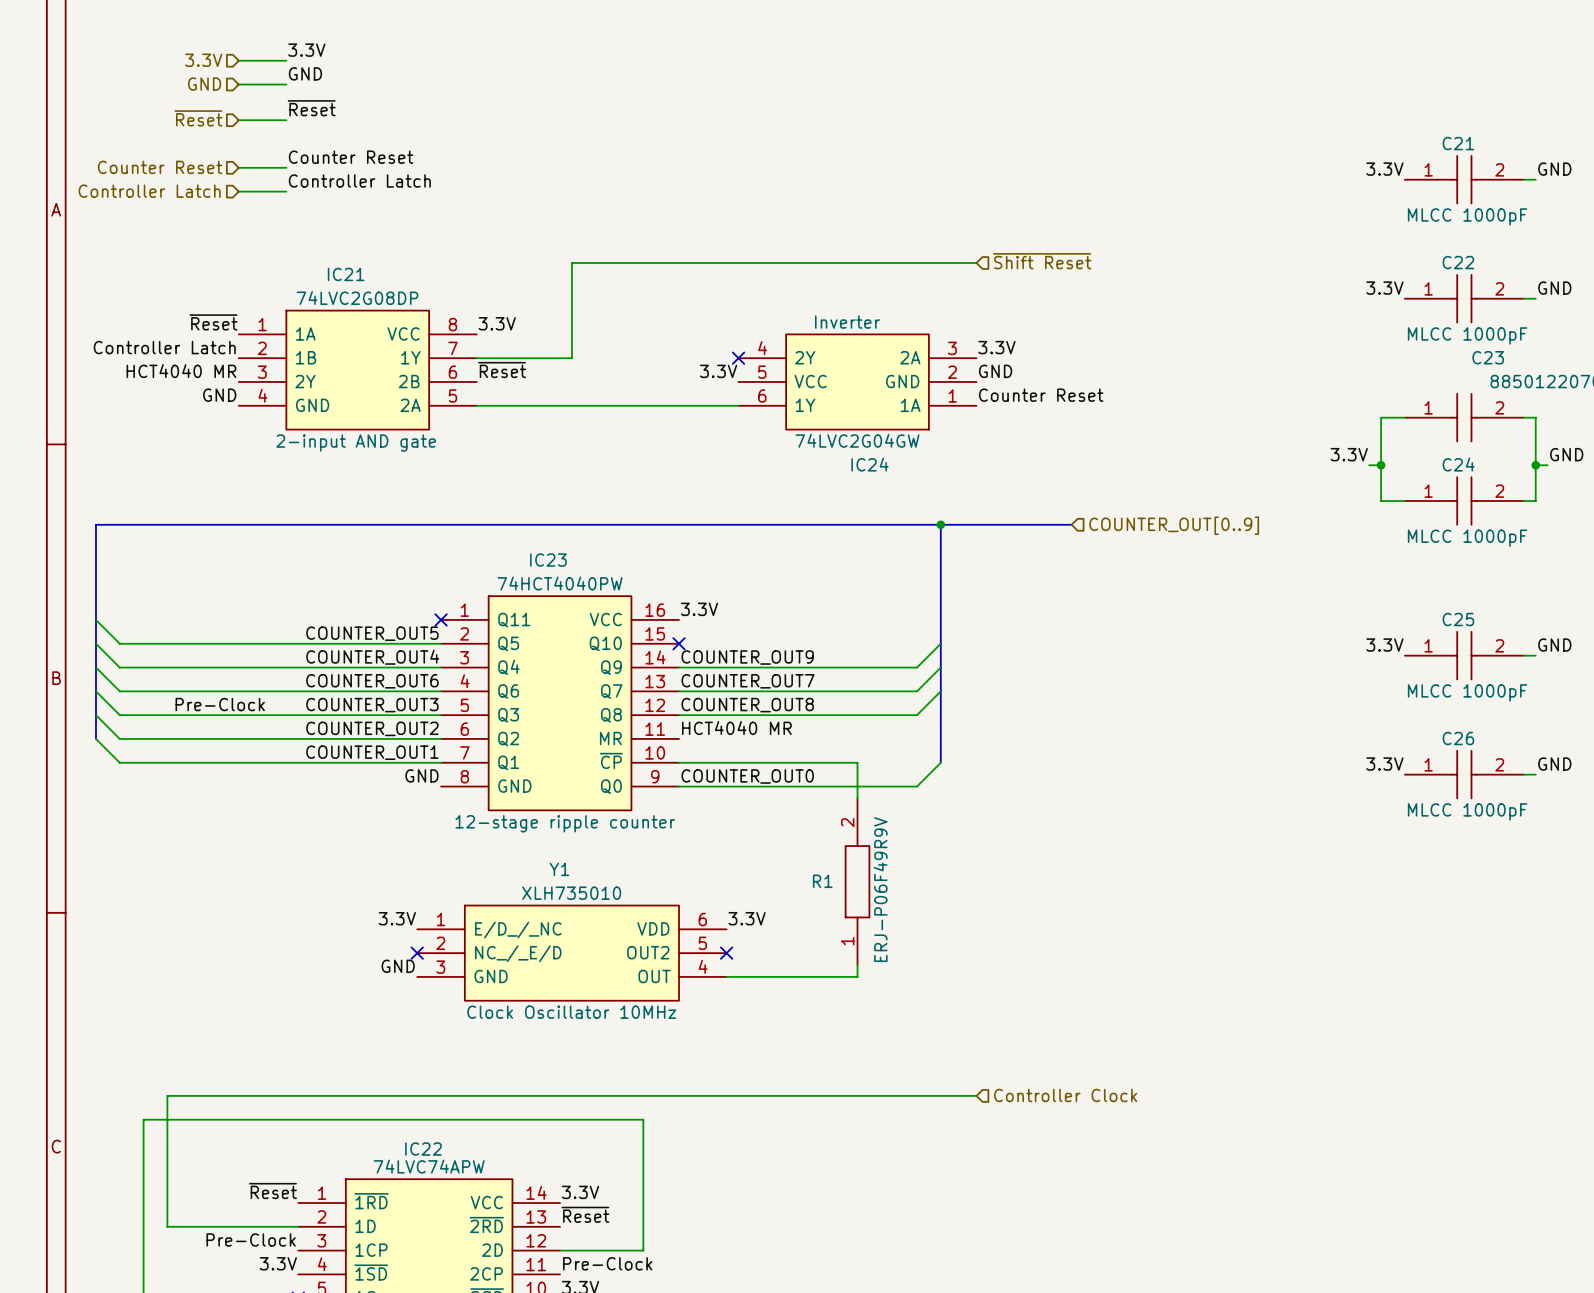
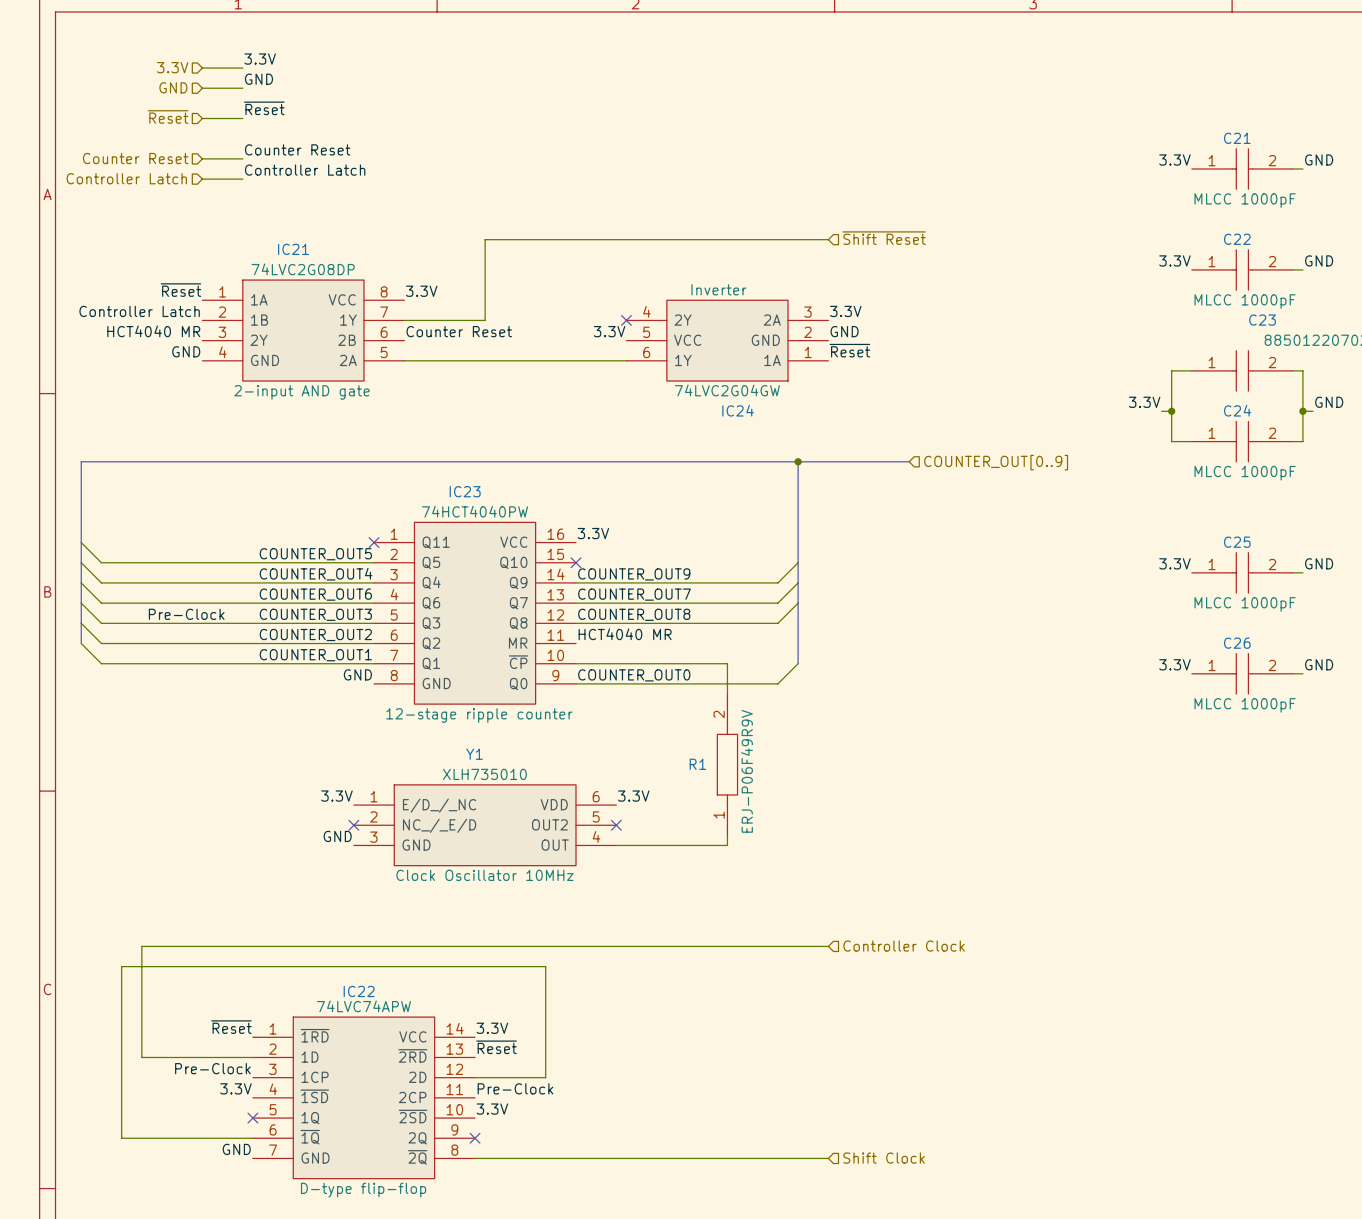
label: ~{Reset} (502, 370) -> Counter Reset (459, 331)
label: Counter Reset (1041, 395) -> ~{Reset} (849, 350)

